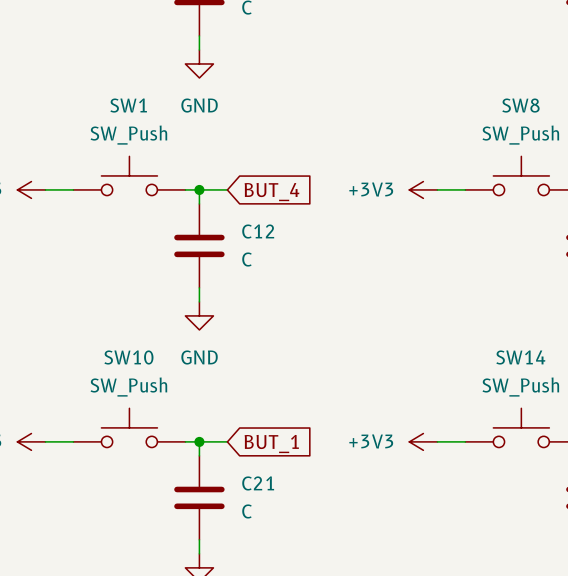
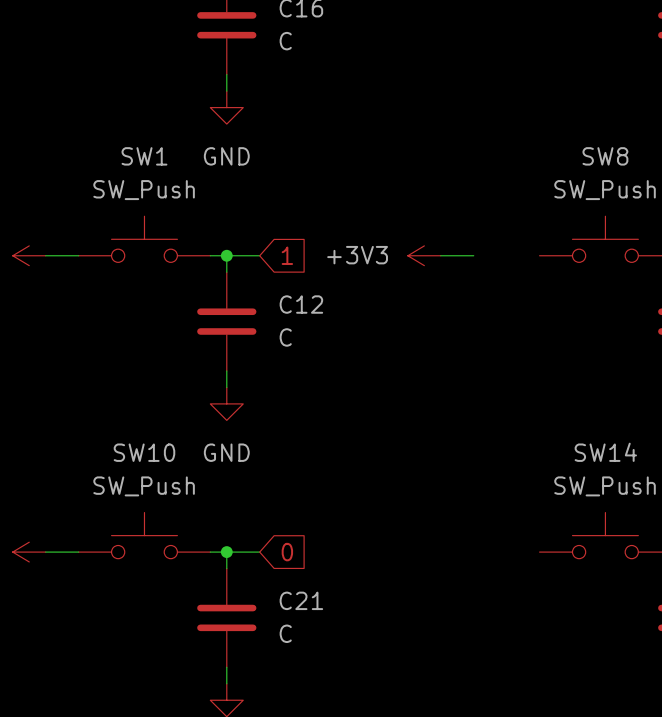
power symbol position: +3V3 (423, 189) -> +3V3 (424, 255)
wire: (437, 189) (465, 189) -> (440, 255) (473, 255)
global label: BUT_4 (271, 192) -> 1 (287, 255)
power symbol: +3V3 (423, 441) -> none
wire: (437, 441) (465, 441) -> none
global label: BUT_1 (271, 444) -> 0 (287, 552)

